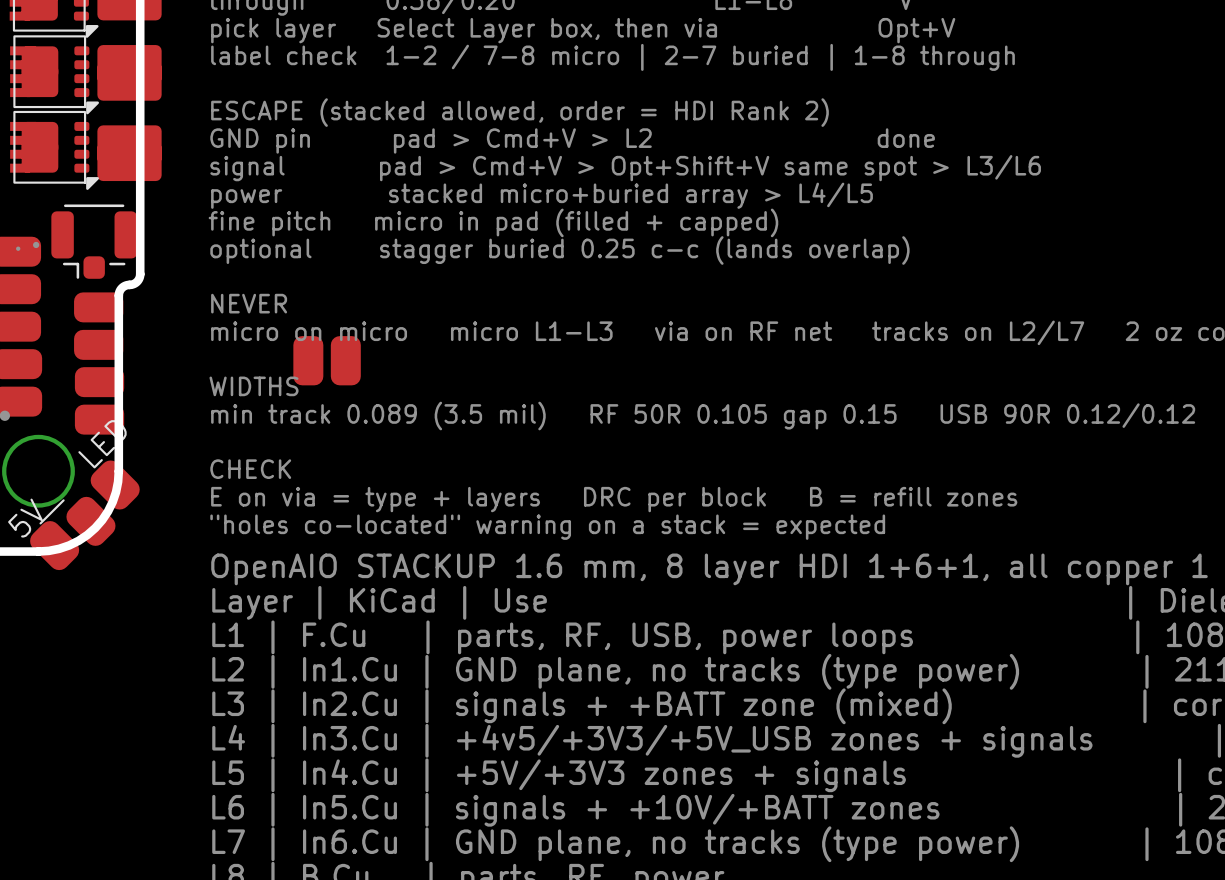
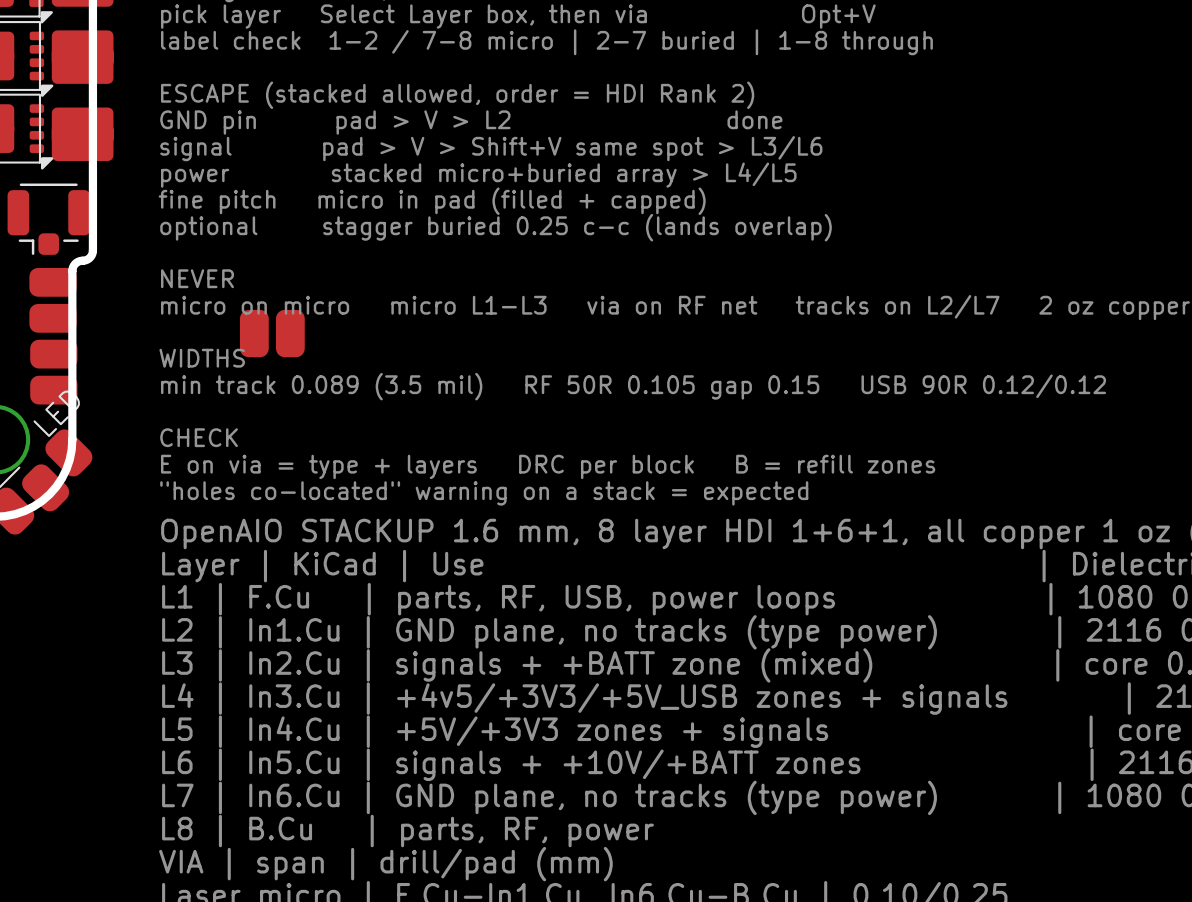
text: GND pin pad > Cmd+V > L2 done (572, 140) -> GND pin pad > V > L2 done (471, 122)
text: signal pad > Cmd+V > Opt+Shift+V same spot > L3/L6 (625, 168) -> signal pad > V > Shift+V same spot > L3/L6 (491, 148)

